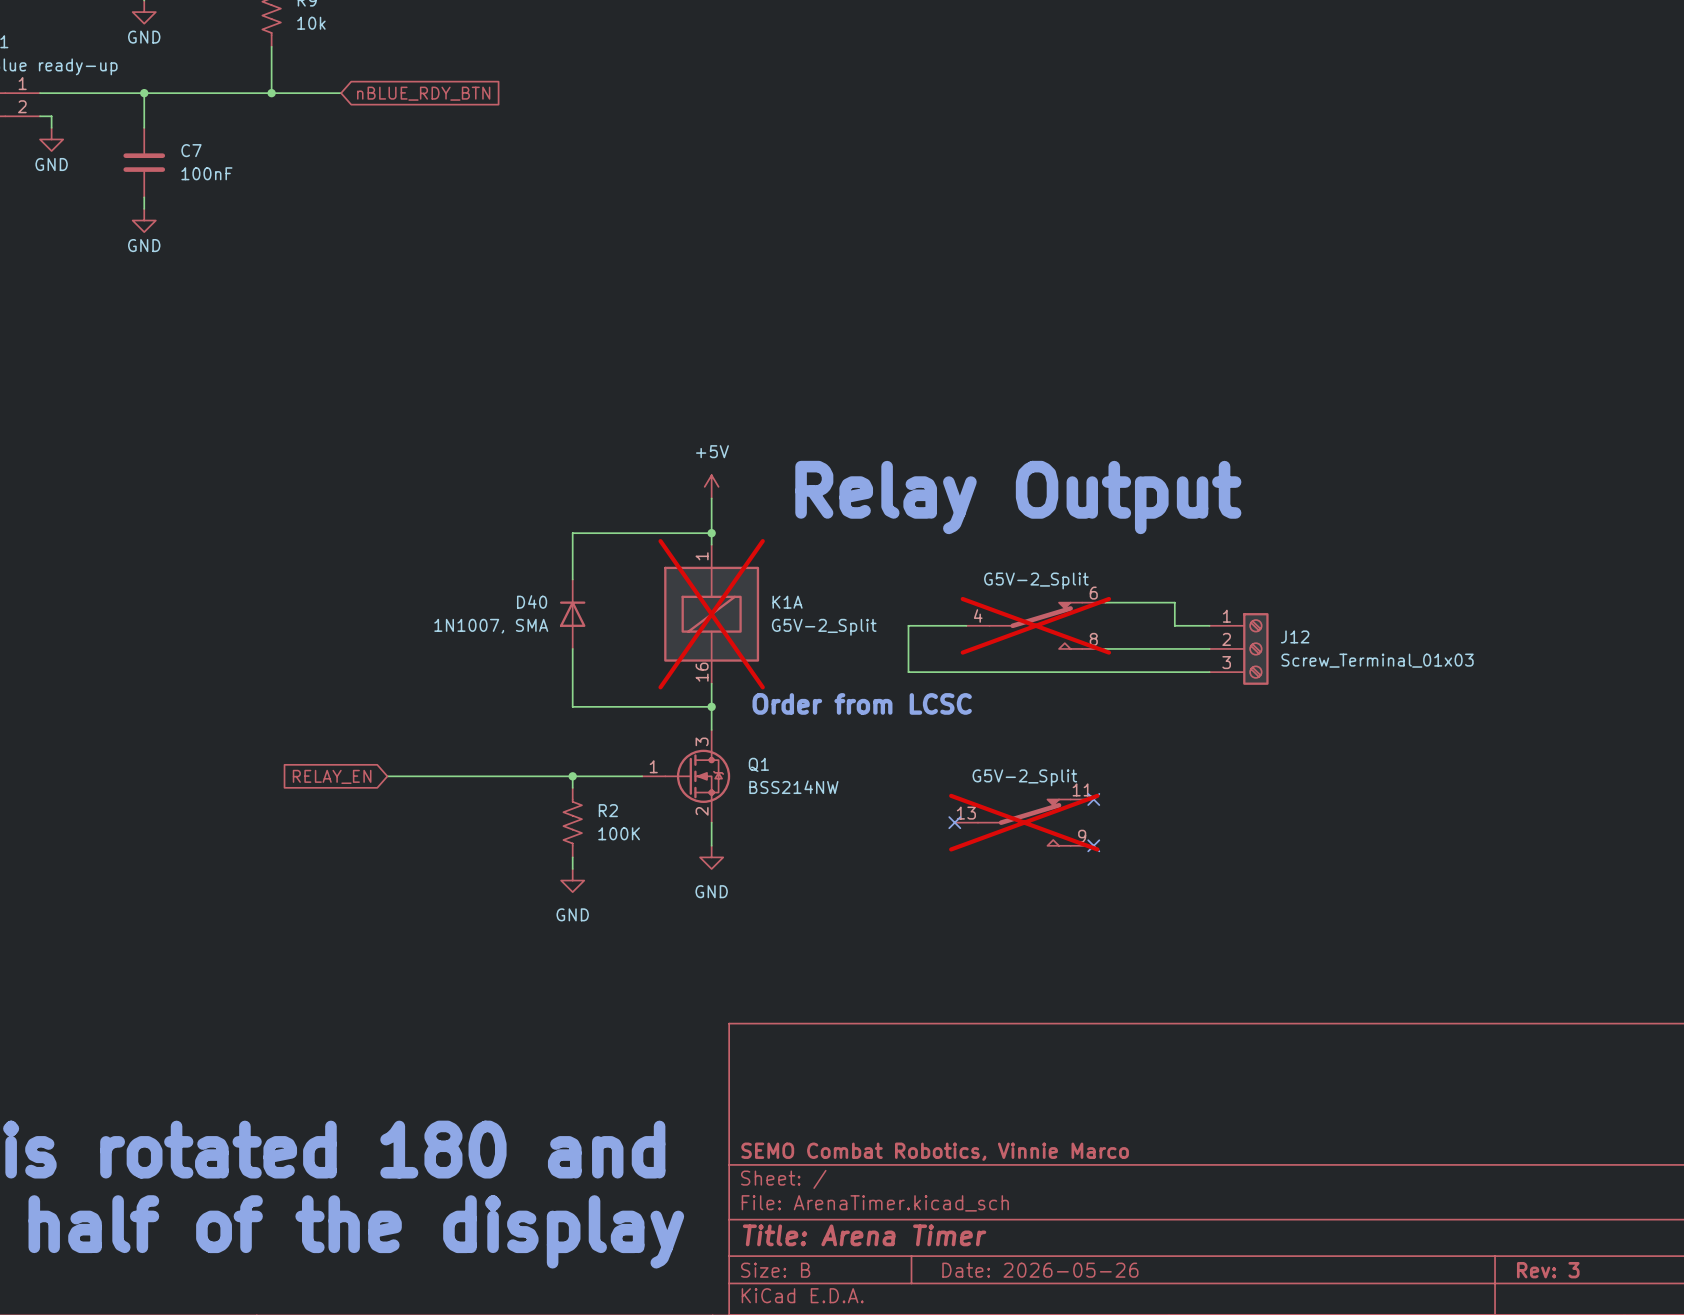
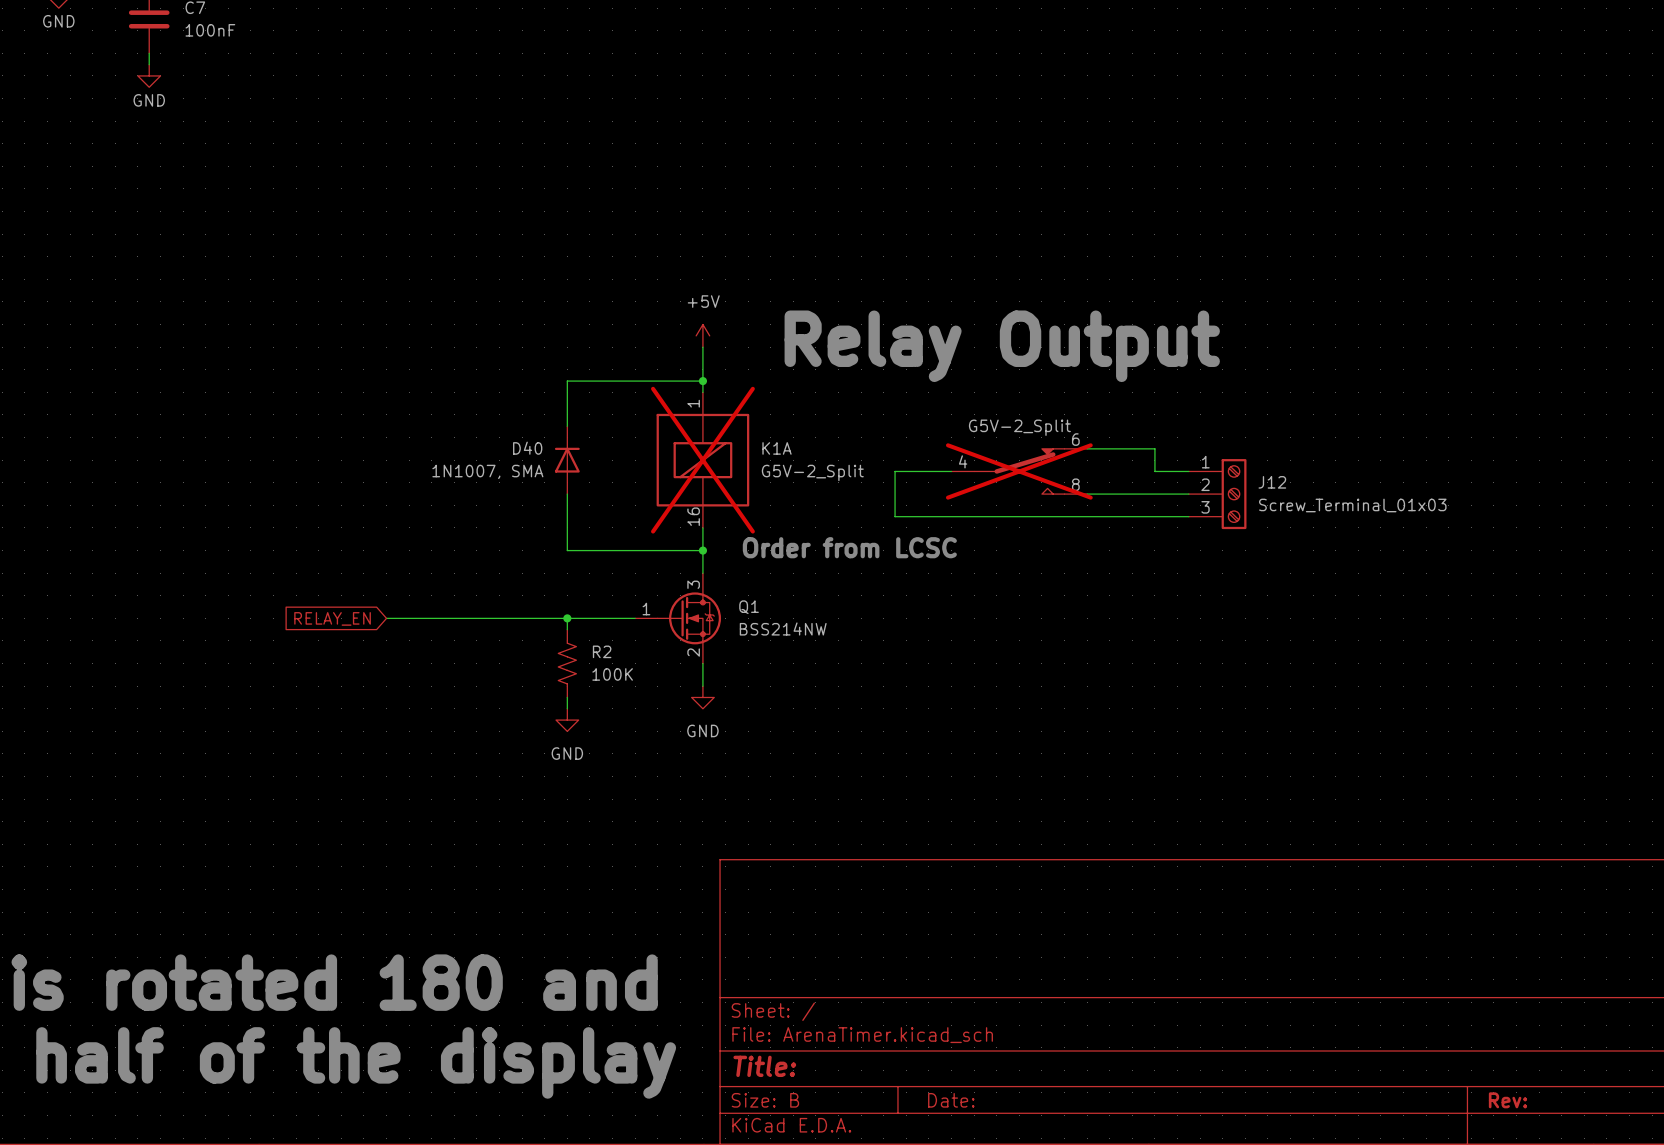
no-connect mark: (1093, 799) -> none
no-connect mark: (954, 822) -> none
part: G5V-2_Split (1024, 822) -> none
no-connect mark: (1093, 845) -> none
title block: SEMO Combat Robotics, Vinnie Marco (935, 1151) -> none
title block: Title: Arena Timer (864, 1235) -> Title: (764, 1066)
title block: Date: 2026-05-26 (1040, 1270) -> Date: (951, 1100)
title block: Rev: 3 (1548, 1270) -> Rev: (1507, 1100)

